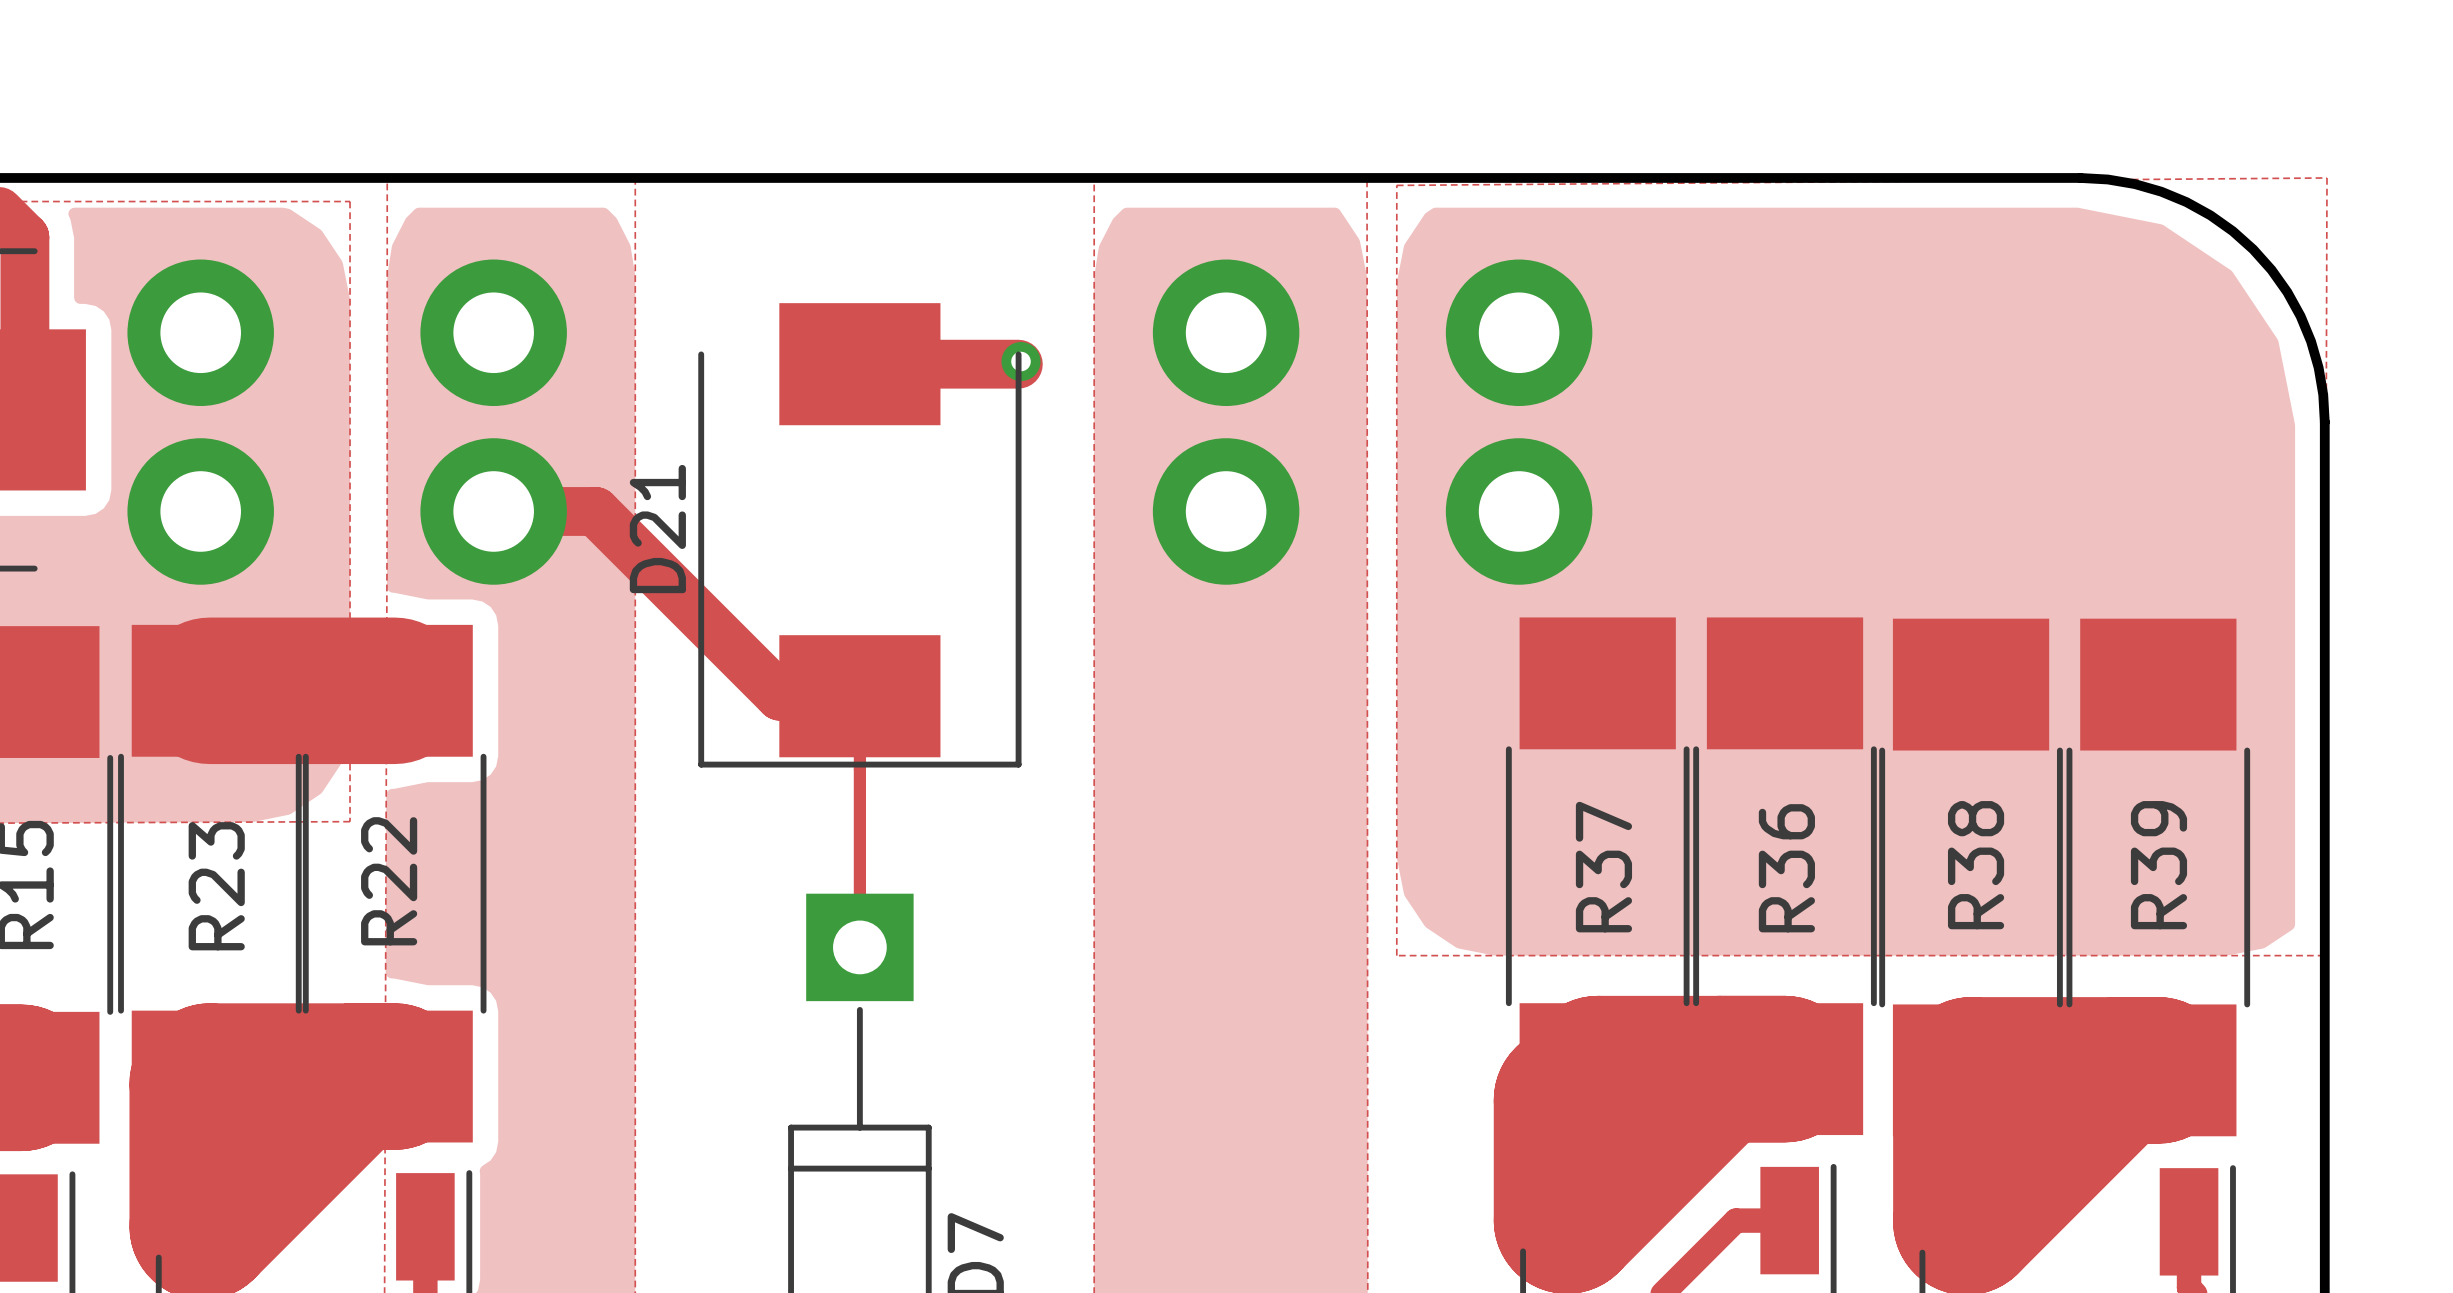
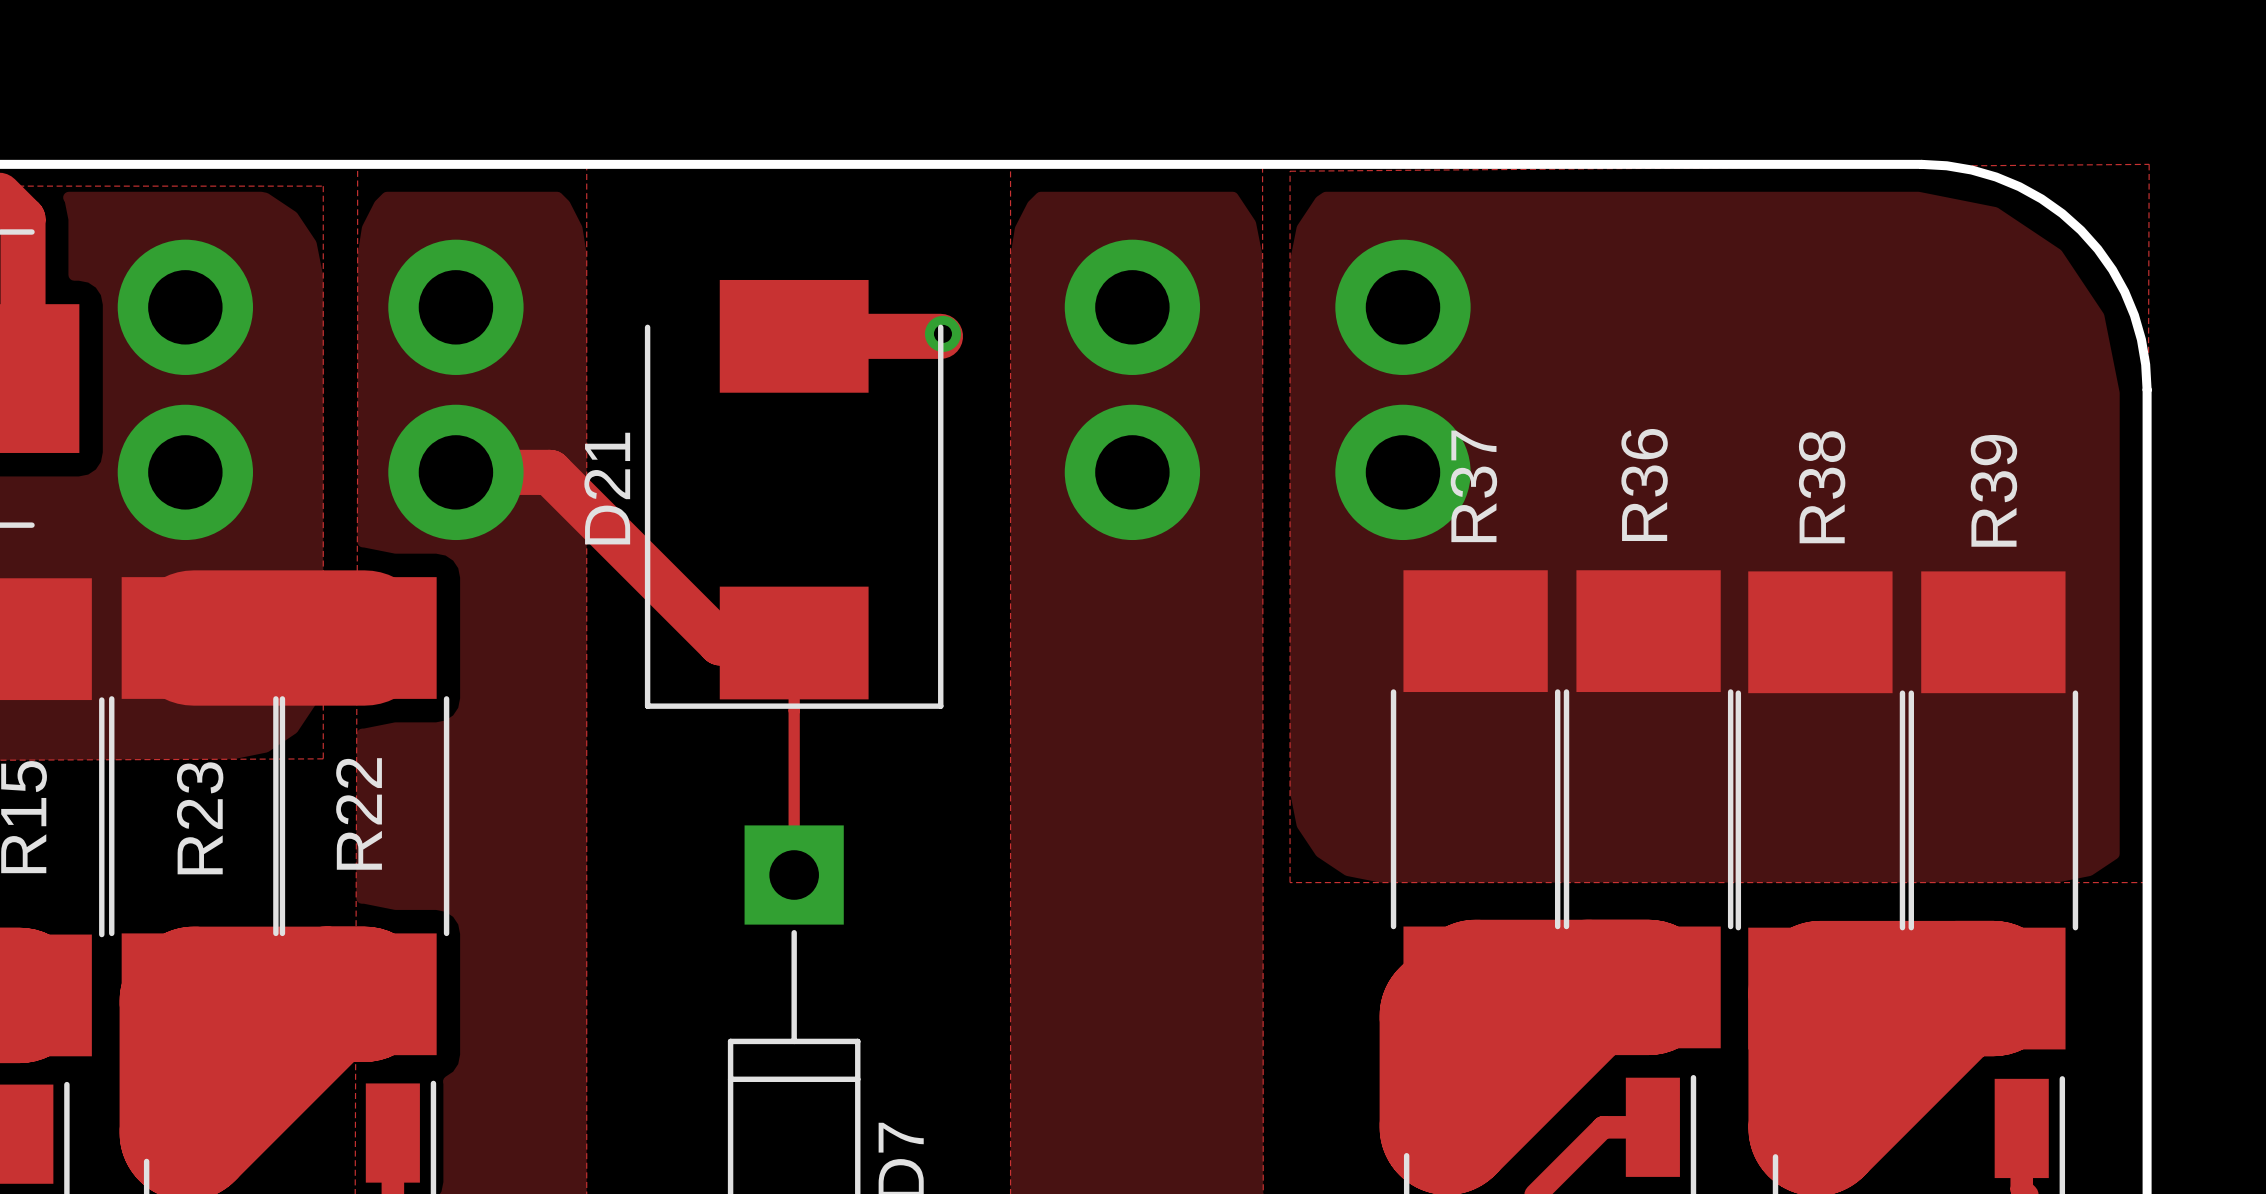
R38 name position: R38 (1976, 865) -> R38 (1822, 487)
R39 name position: R39 (2158, 865) -> R39 (1993, 490)
R37 name position: R37 (1603, 867) -> R37 (1473, 486)
R36 name position: R36 (1786, 868) -> R36 (1644, 485)

